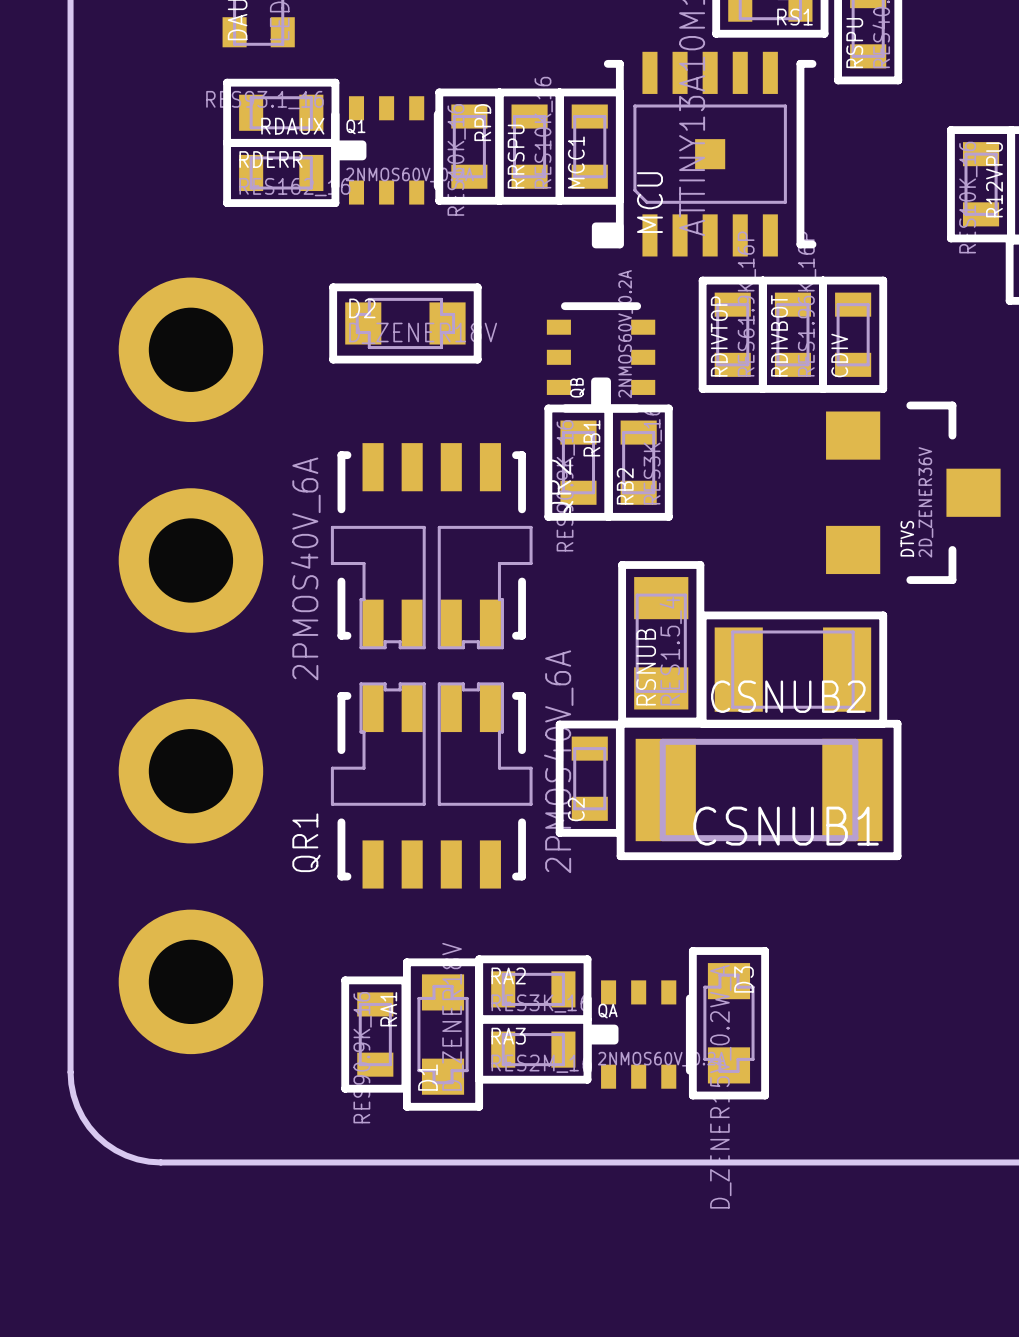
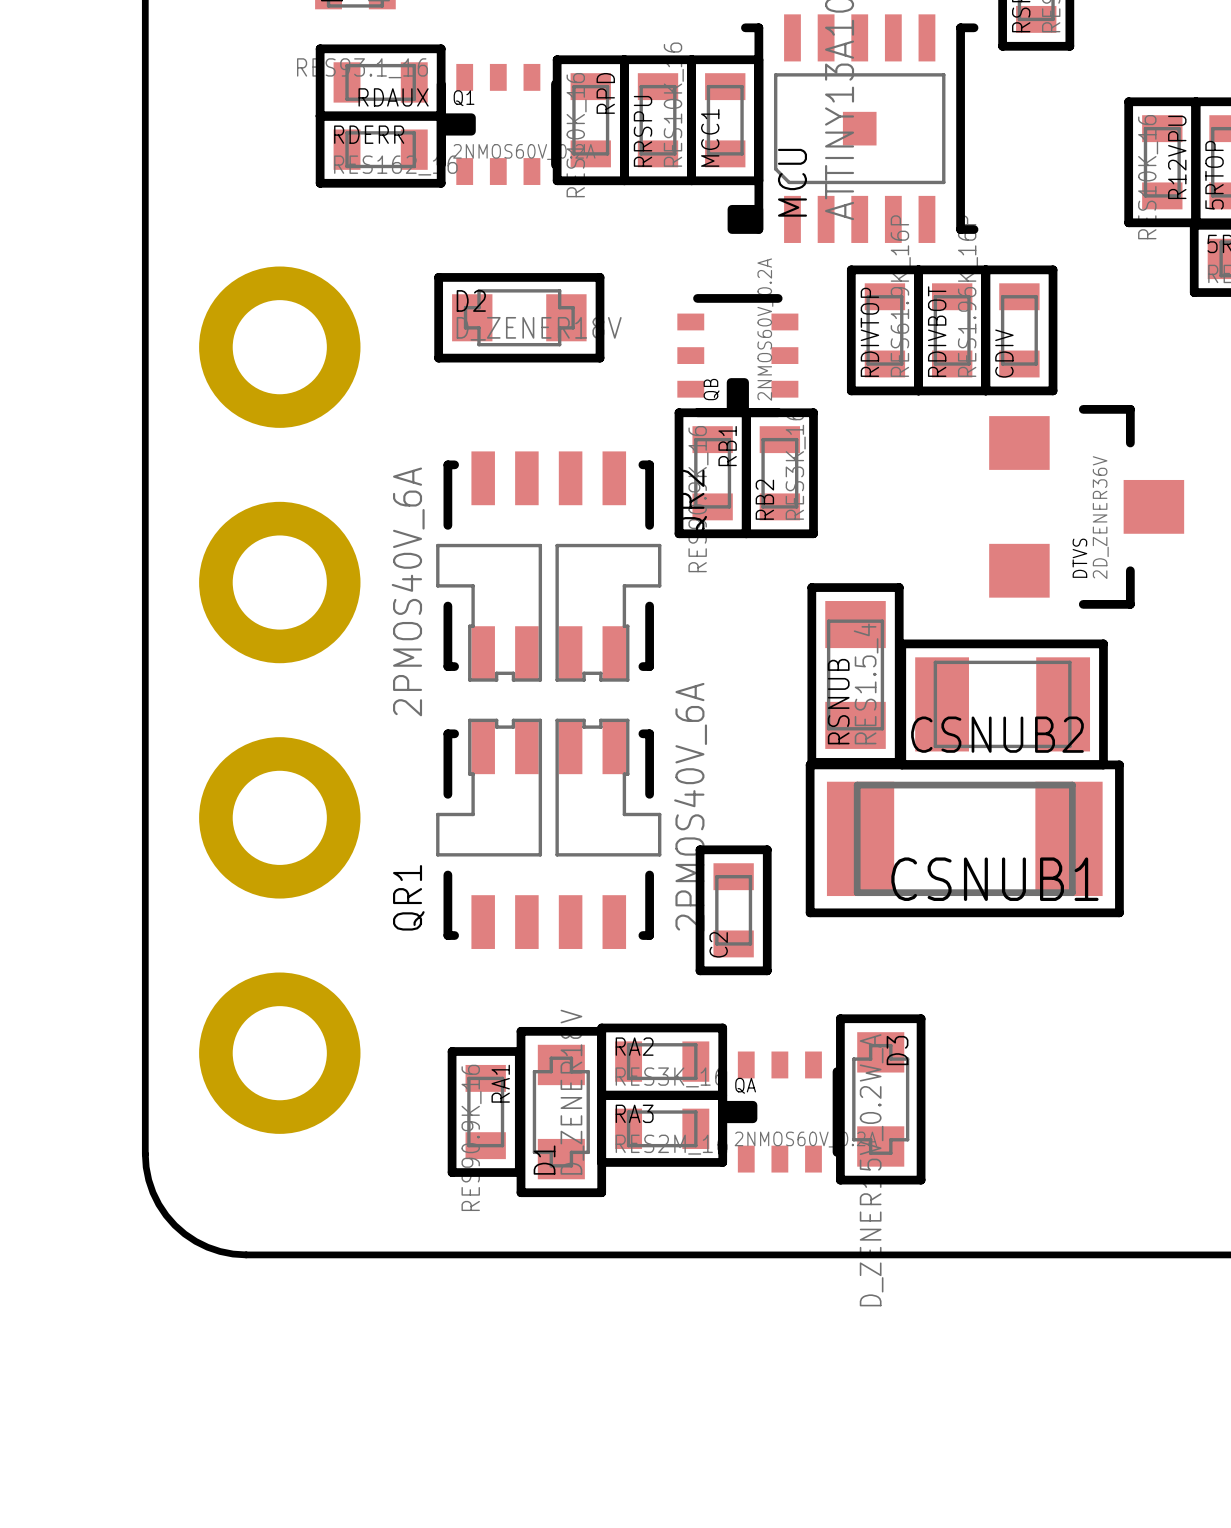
RSNUB position: (661, 643) -> (855, 674)
CSNUB2 position: (792, 669) -> (1002, 704)
C2 position: (589, 778) -> (733, 910)
CSNUB1 position: (759, 789) -> (964, 838)

